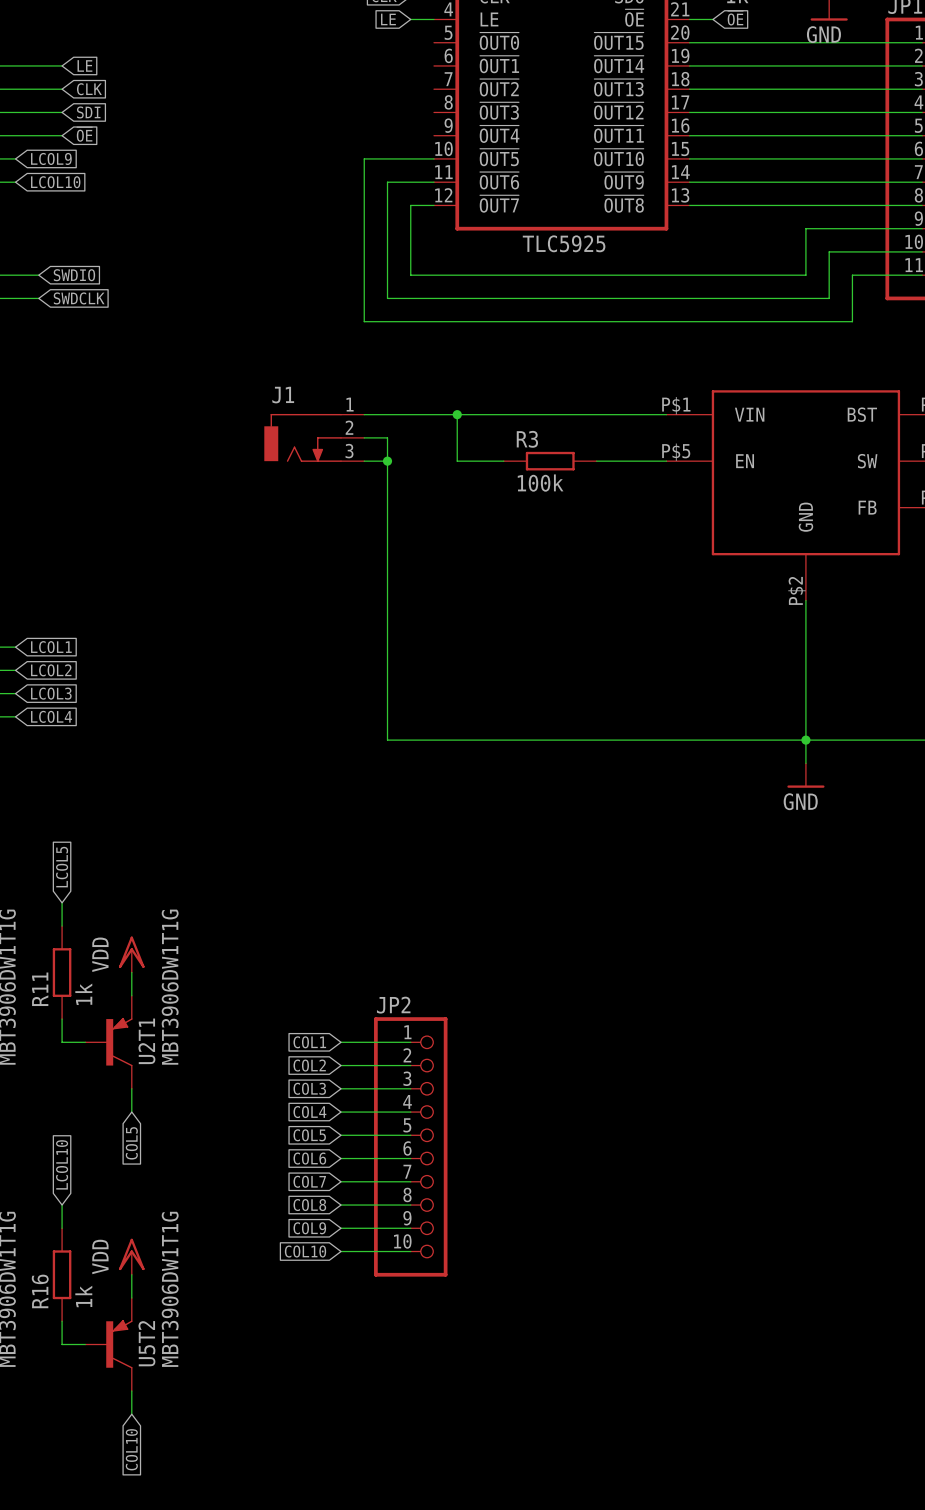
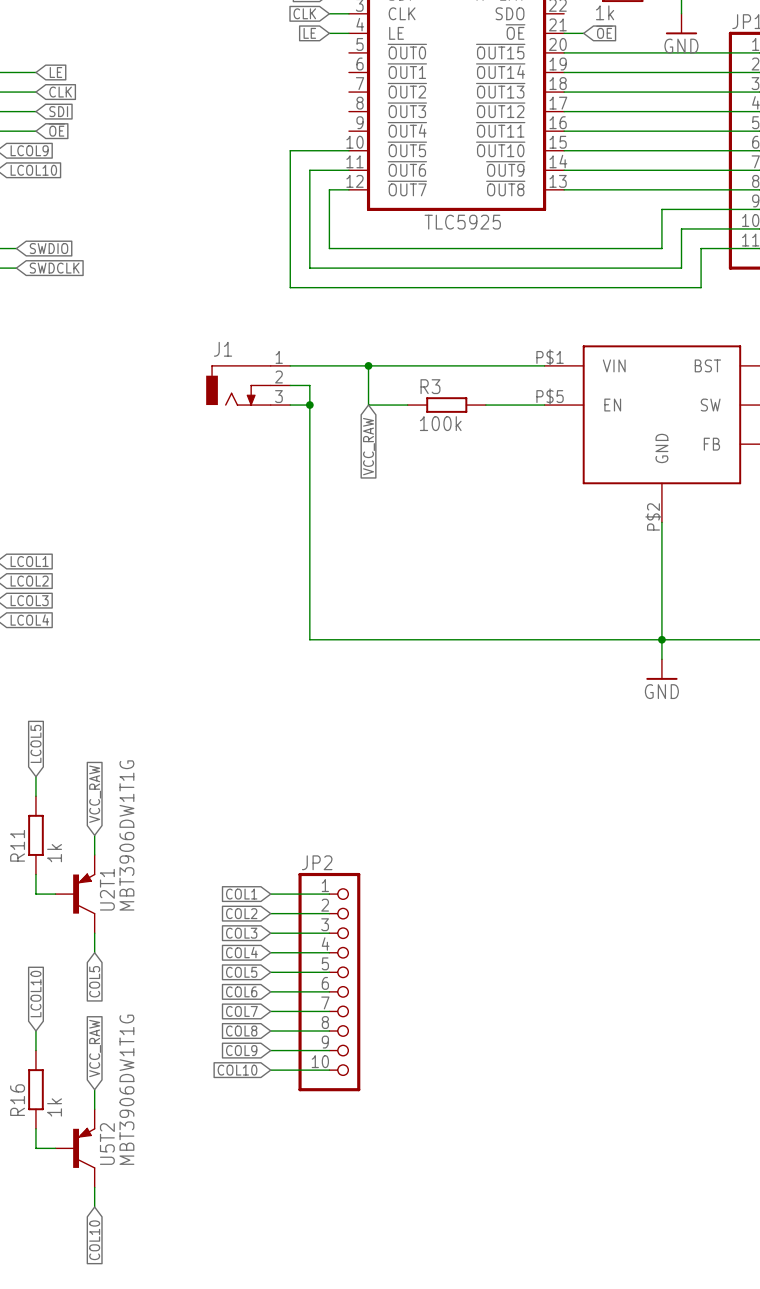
global label: none -> VCC_RAW (368, 446)
global label: none -> VCC_RAW (95, 794)
power symbol: VDD (131, 954) -> none
global label: none -> VCC_RAW (95, 1048)
power symbol: VDD (131, 1256) -> none

